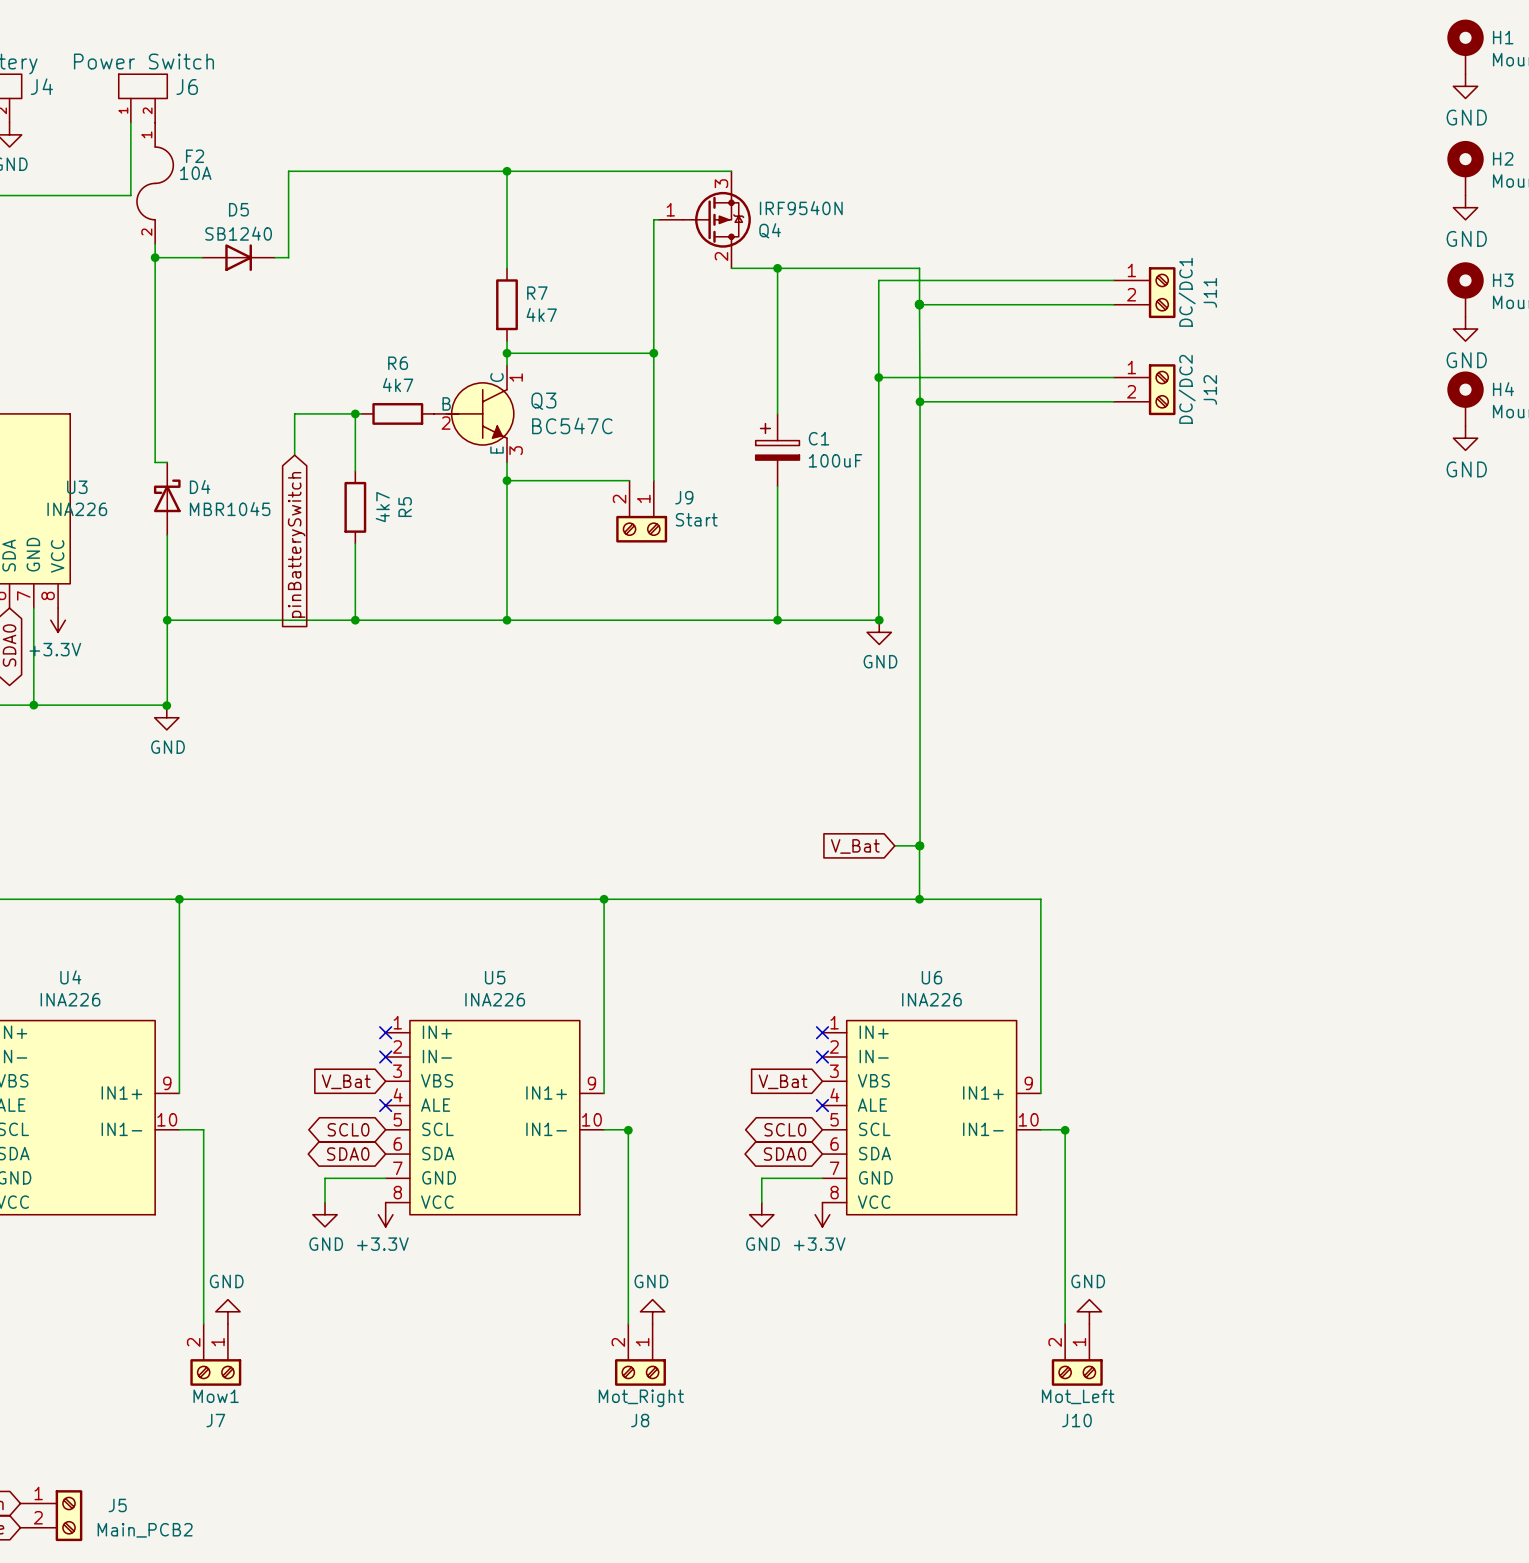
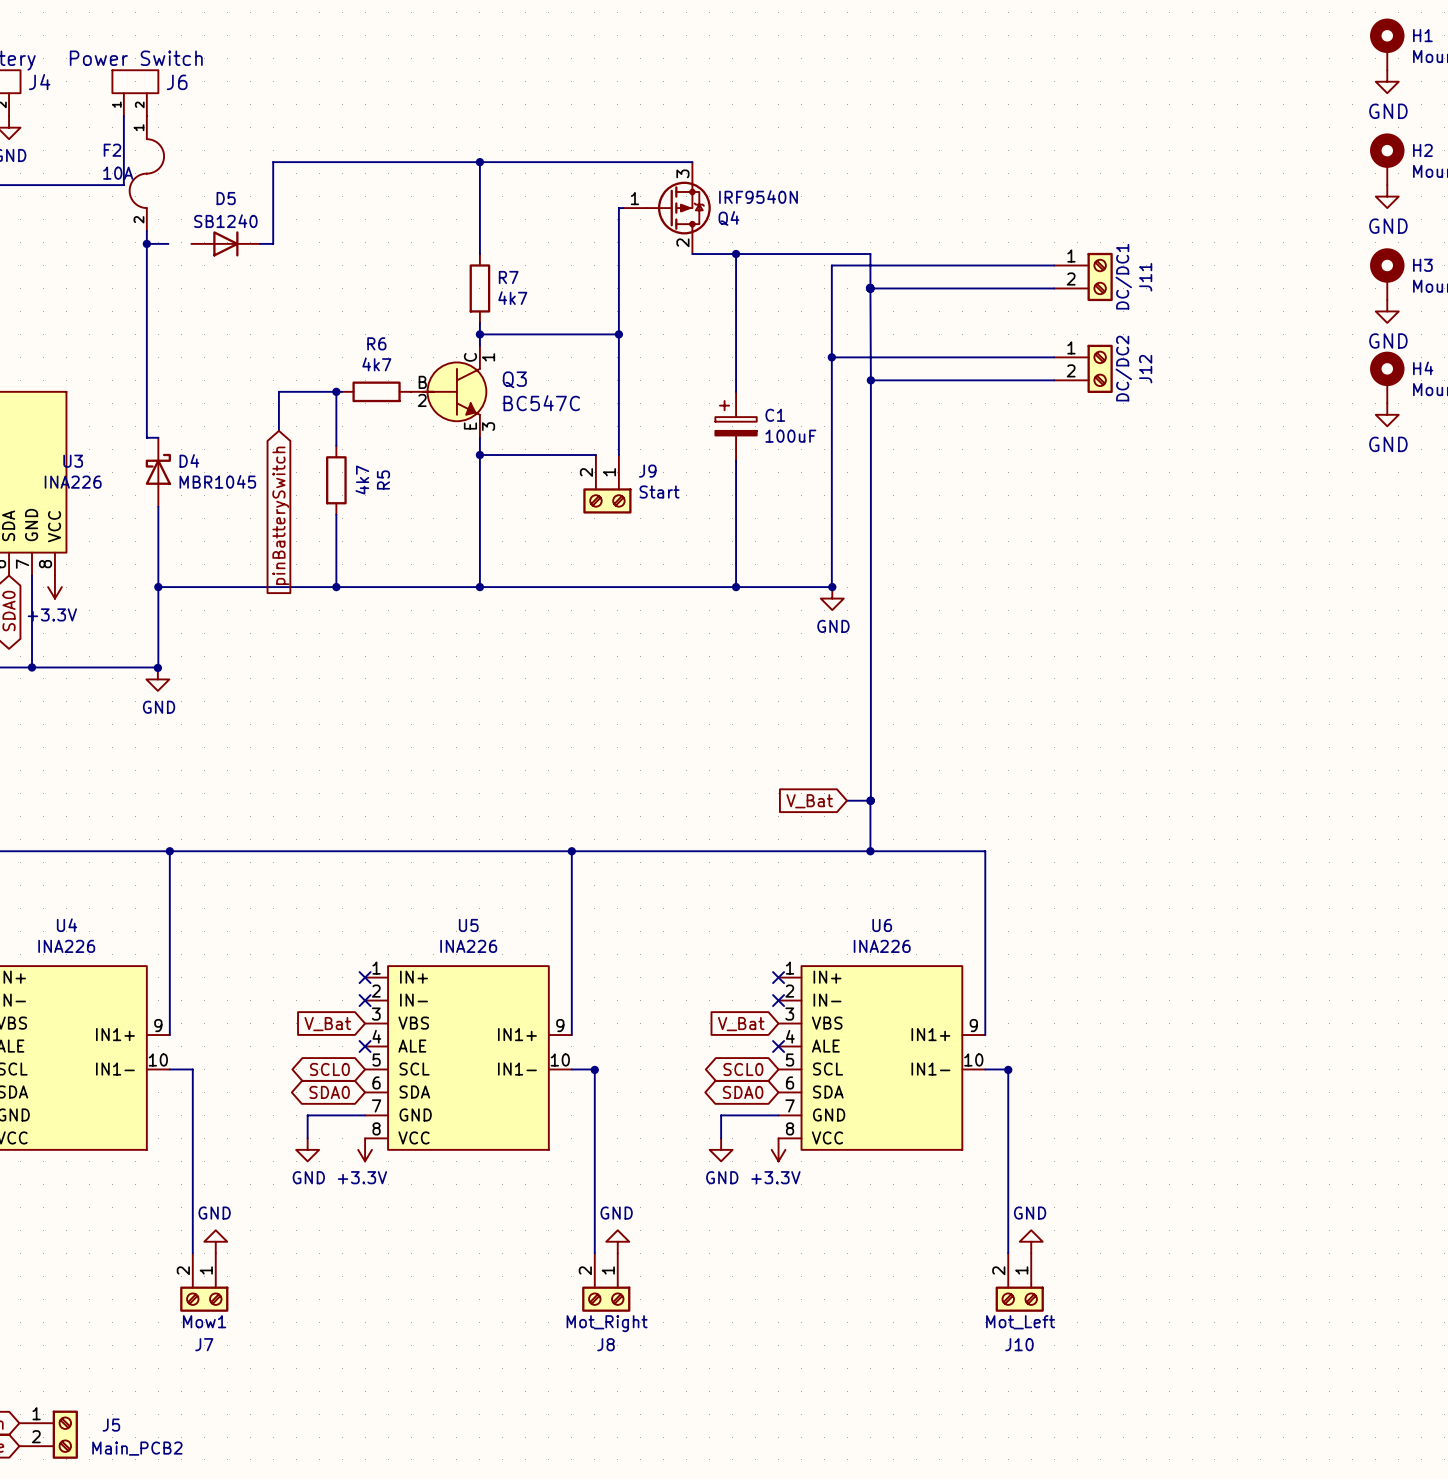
F2 name position: F2 (195, 156) -> F2 (112, 150)
F2 value position: 10A (195, 173) -> 10A (118, 173)
wire: (177, 257) (202, 257) -> none

